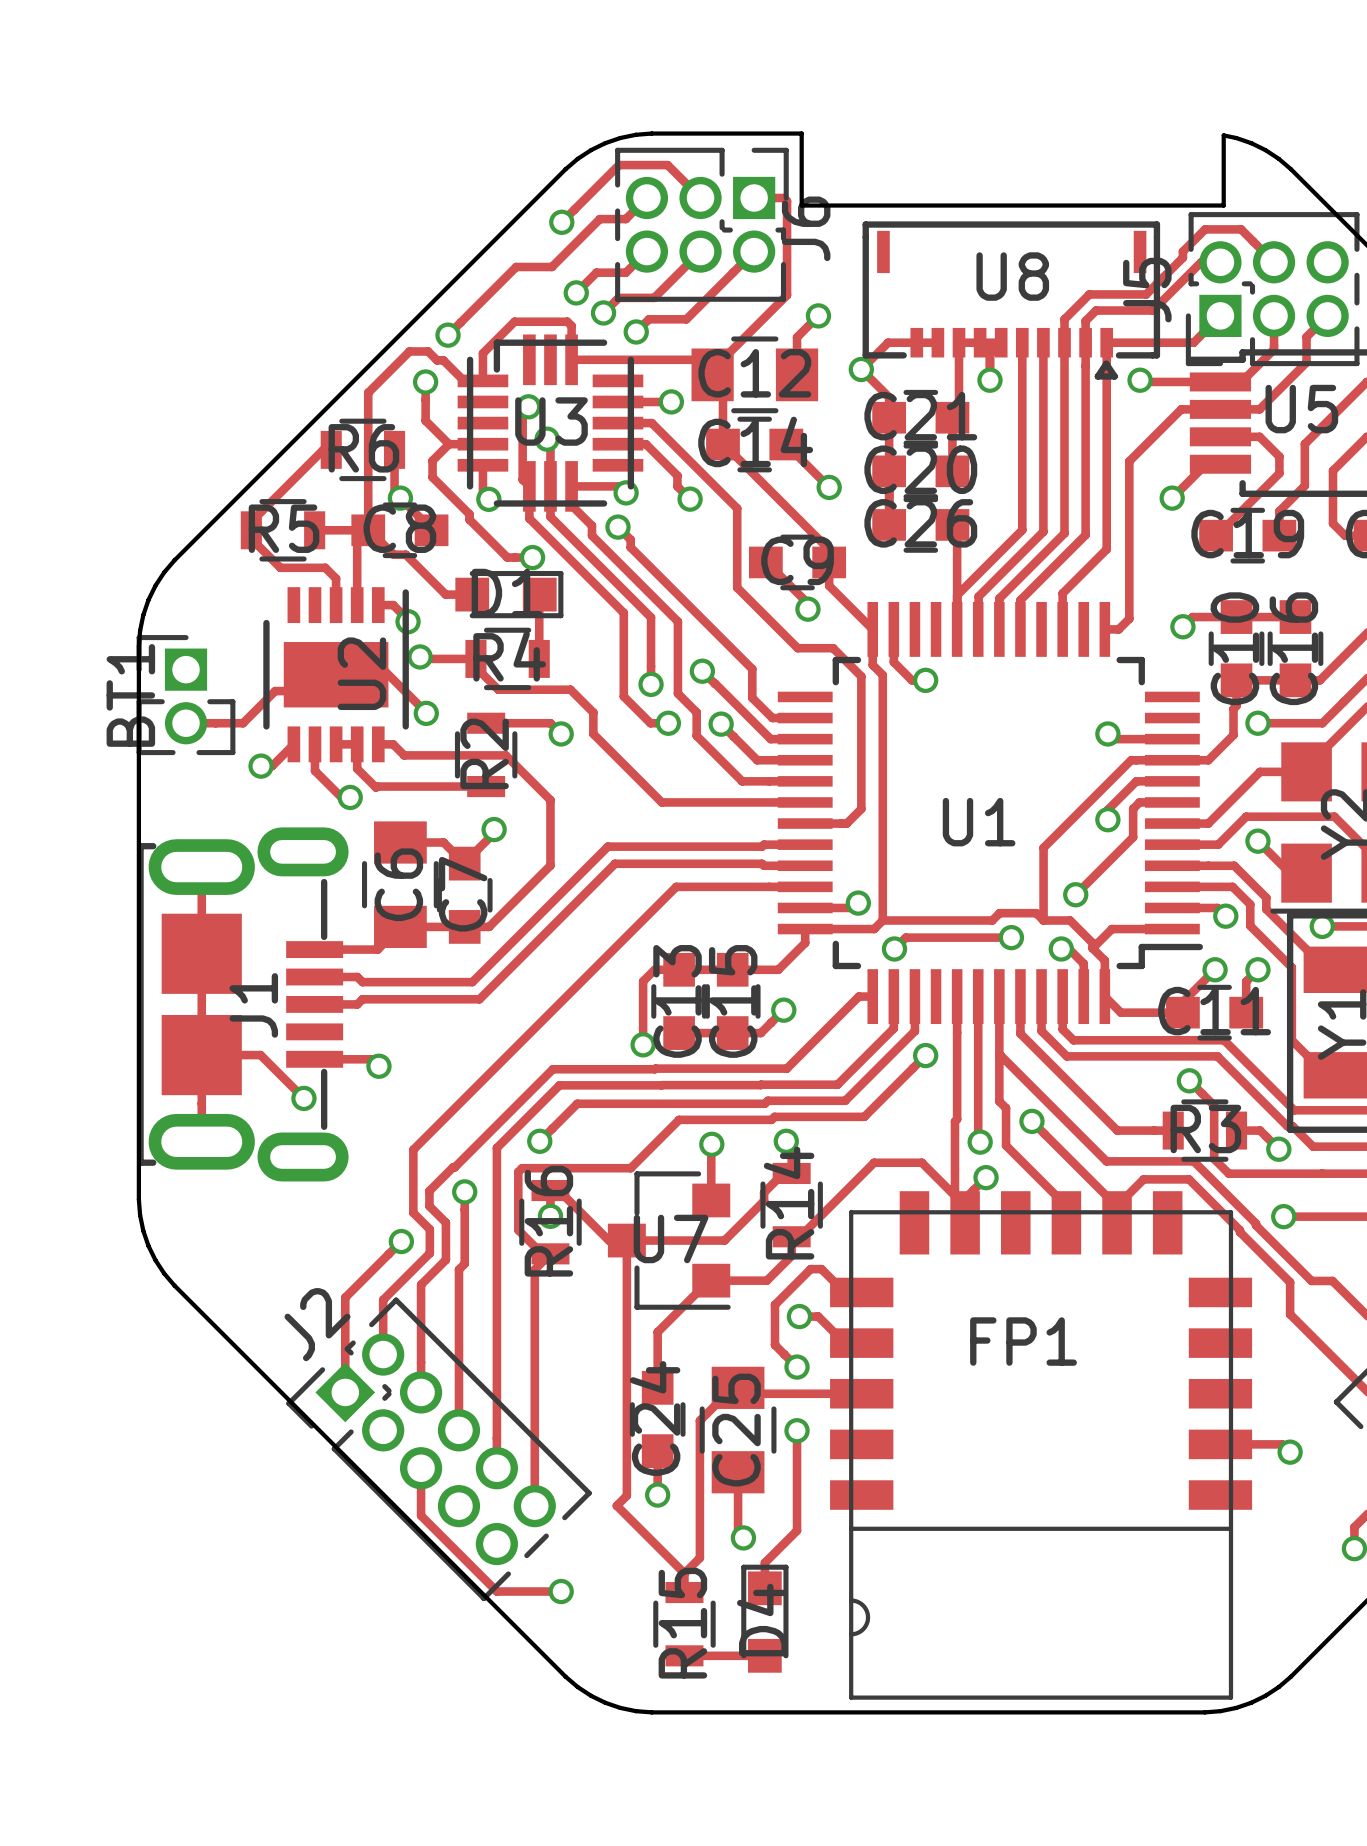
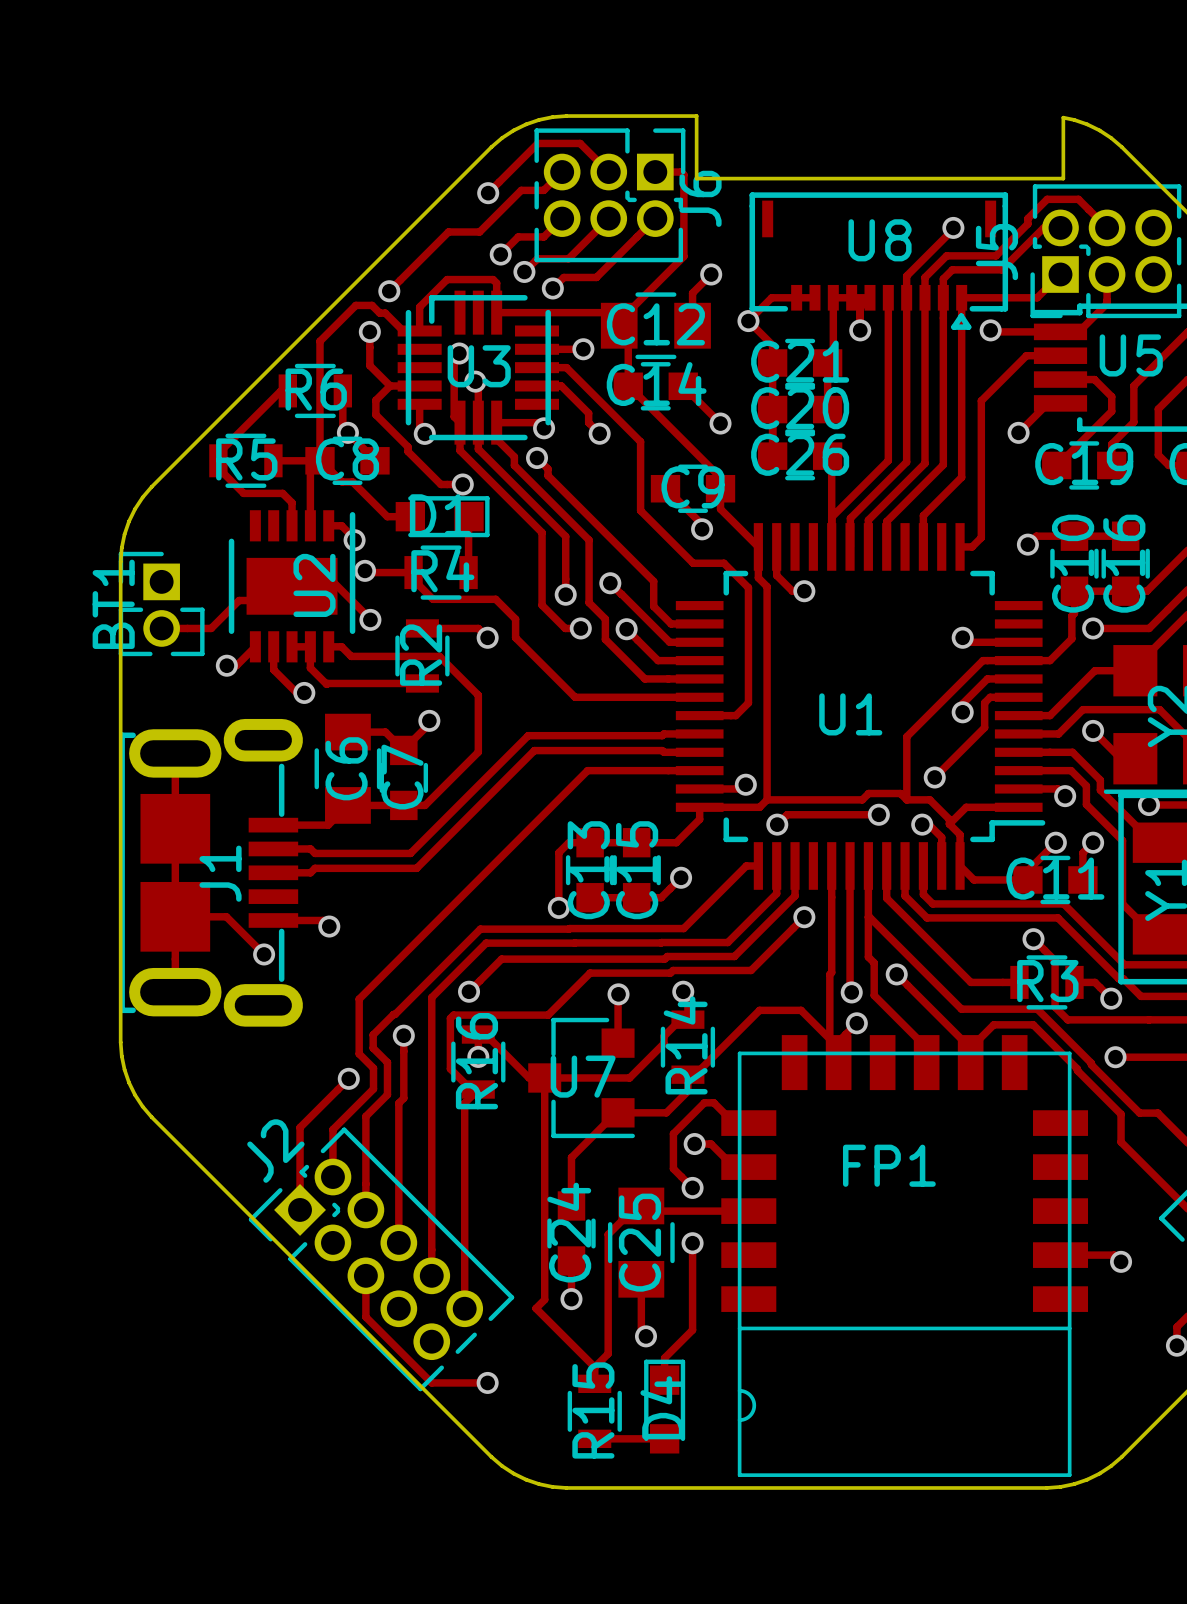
track: none -> (953, 227) (906, 276) (906, 297)
via: none -> (953, 227)
track: (1322, 321) (1306, 337) (1306, 362) (1259, 409) (1220, 409) -> none

